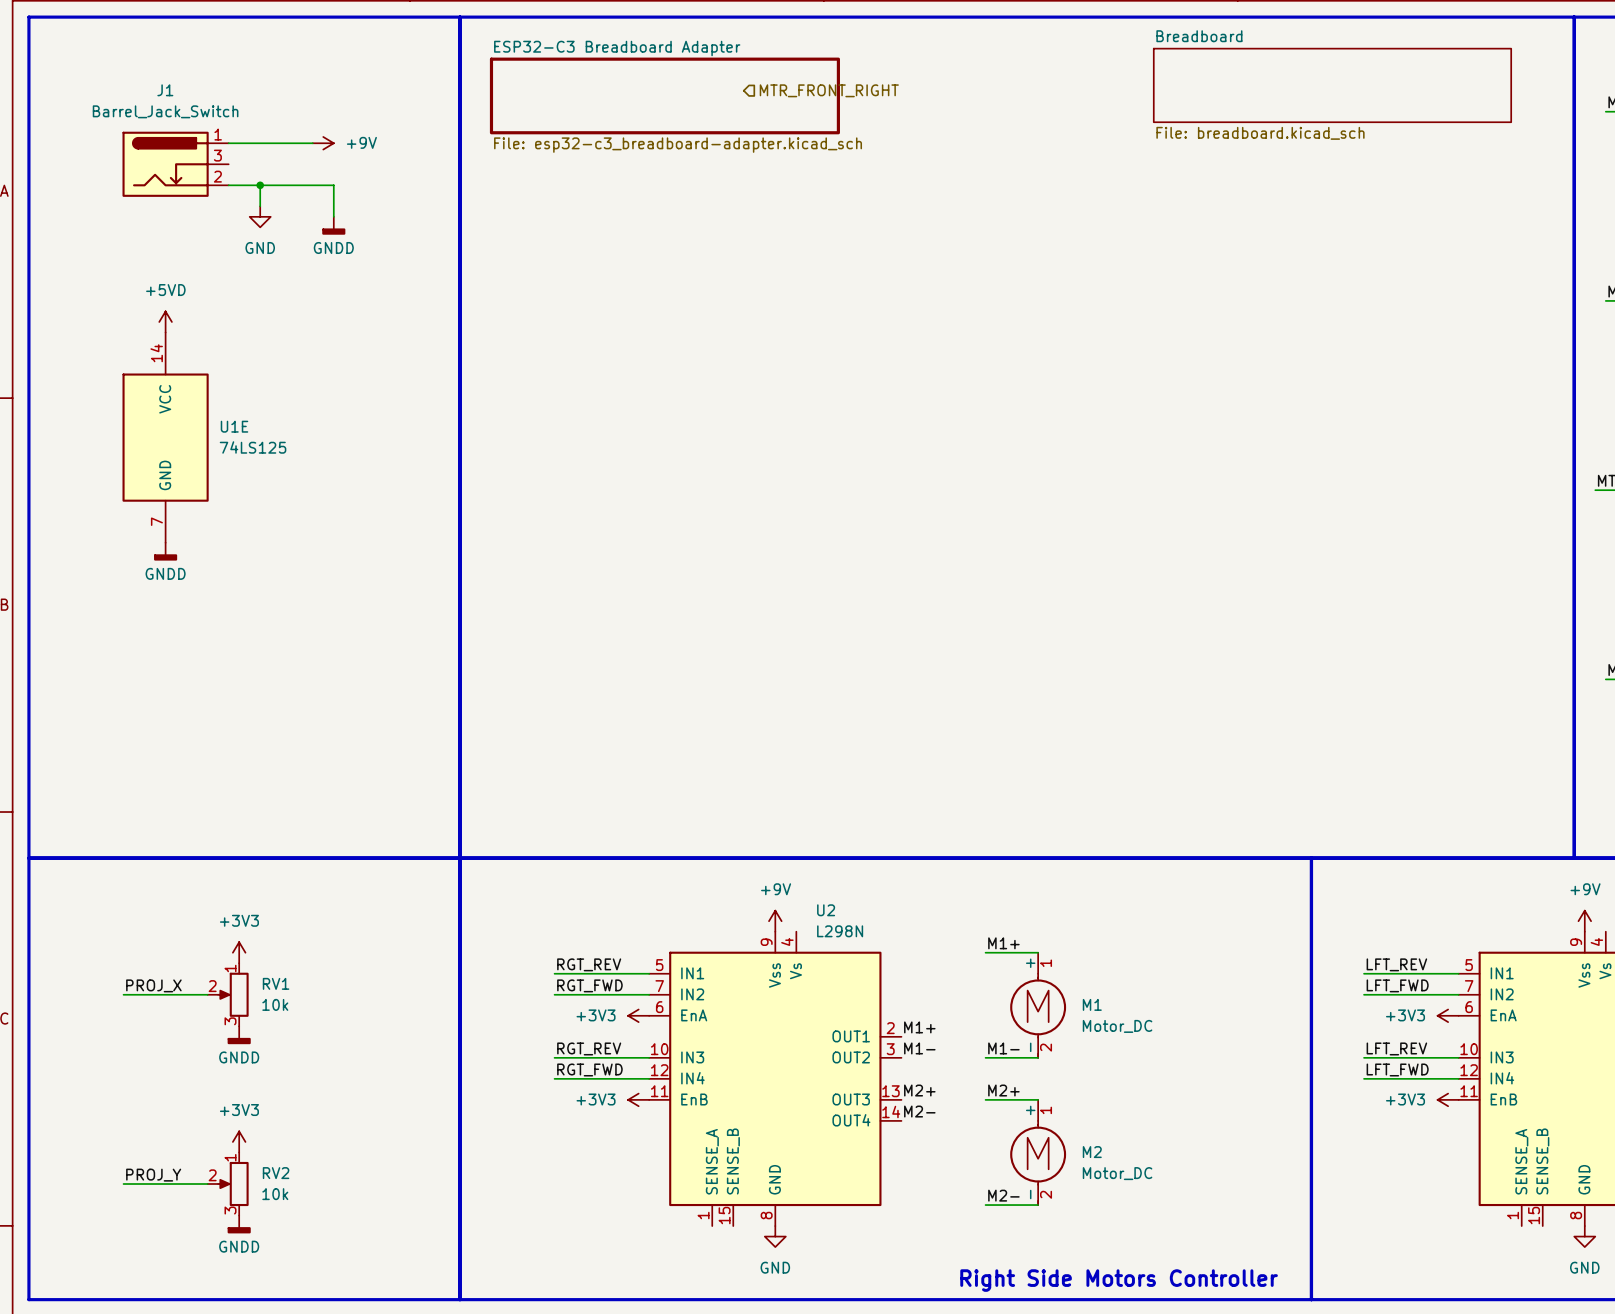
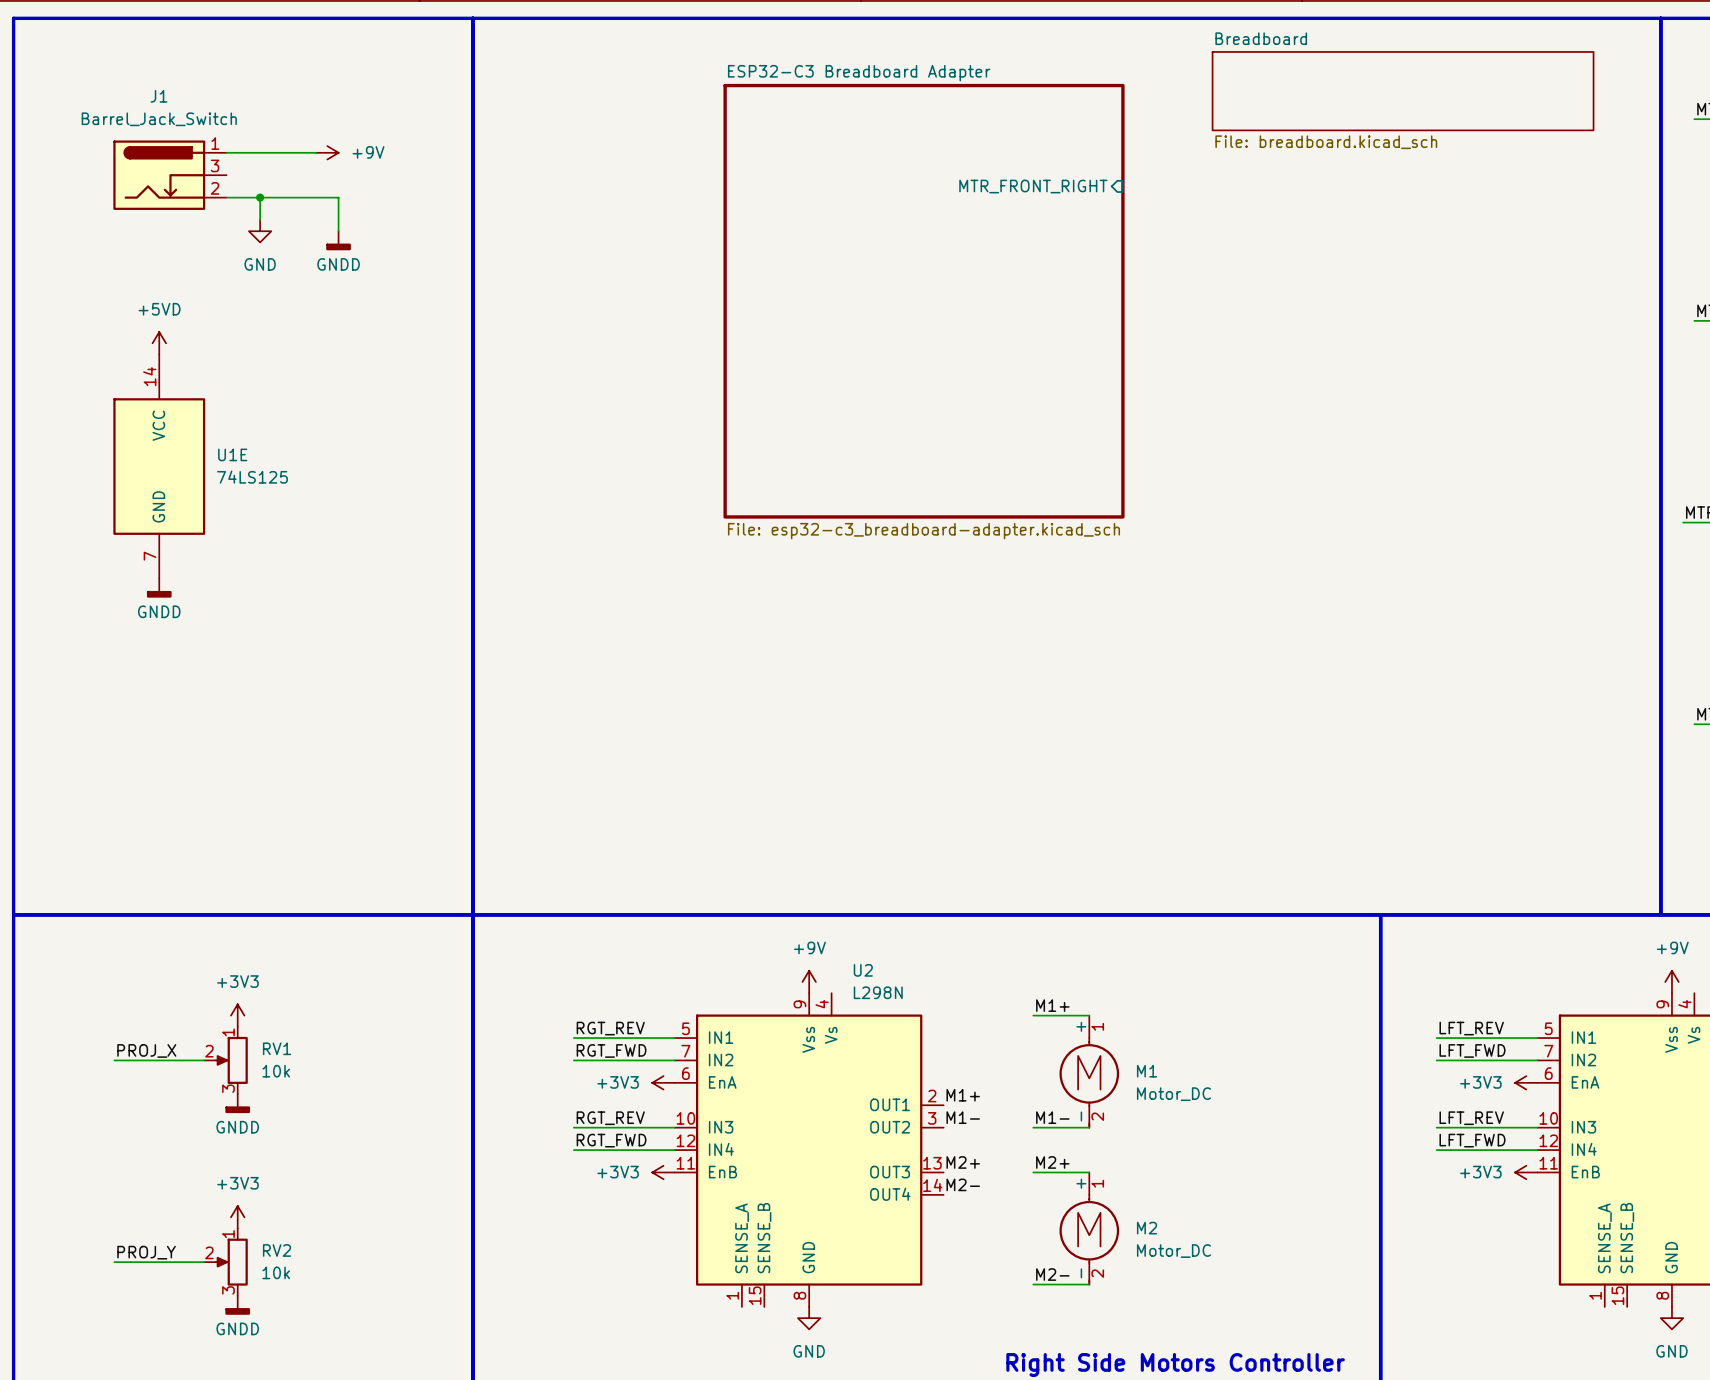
sheet ESP32-C3 Breadboard Adapter name position: ESP32-C3 Breadboard Adapter (617, 48) -> ESP32-C3 Breadboard Adapter (859, 73)
sheet ESP32-C3 Breadboard Adapter shape: [489, 57, 840, 135] -> [723, 83, 1125, 519]
hierarchical label: MTR_FRONT_RIGHT (829, 90) -> none
sheet ESP32-C3 Breadboard Adapter value position: File: esp32-c3_breadboard-adapter.kicad_sch (678, 145) -> File: esp32-c3_breadboard-adapter.kicad_sch (923, 531)
sheet pin: none -> MTR_FRONT_RIGHT (1033, 186)

